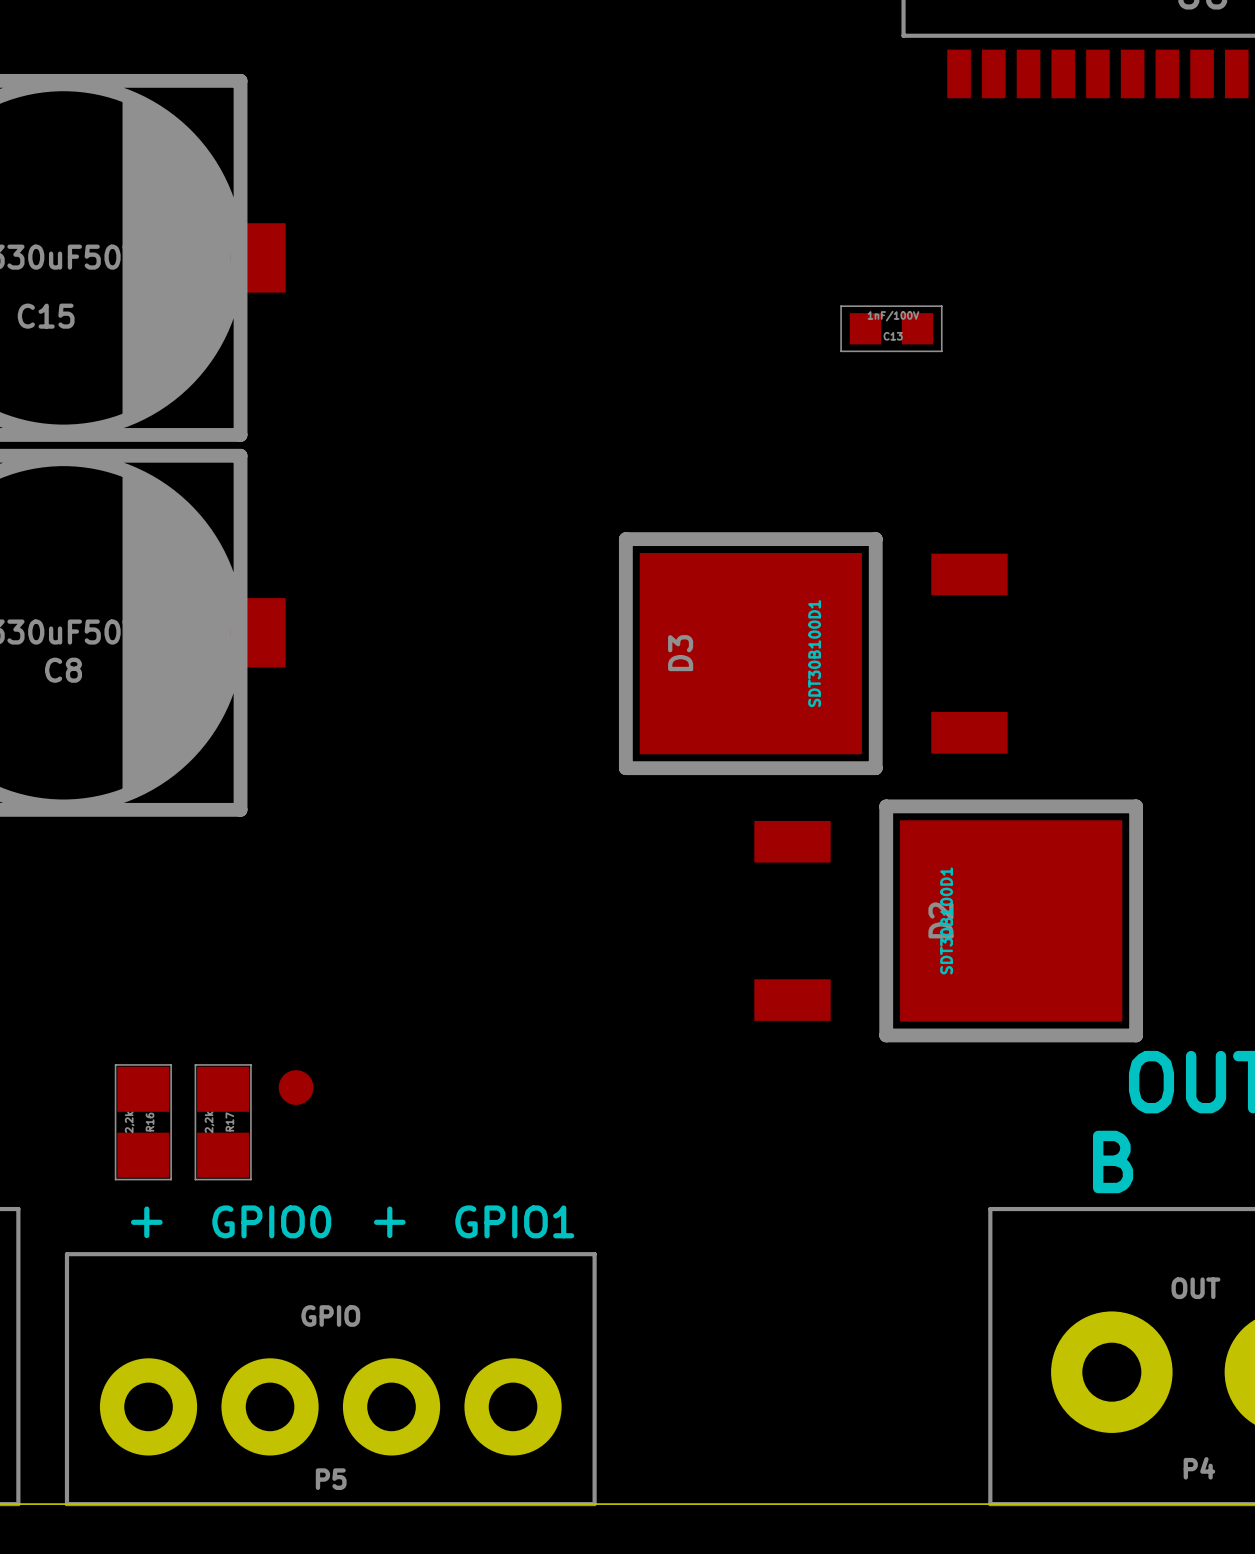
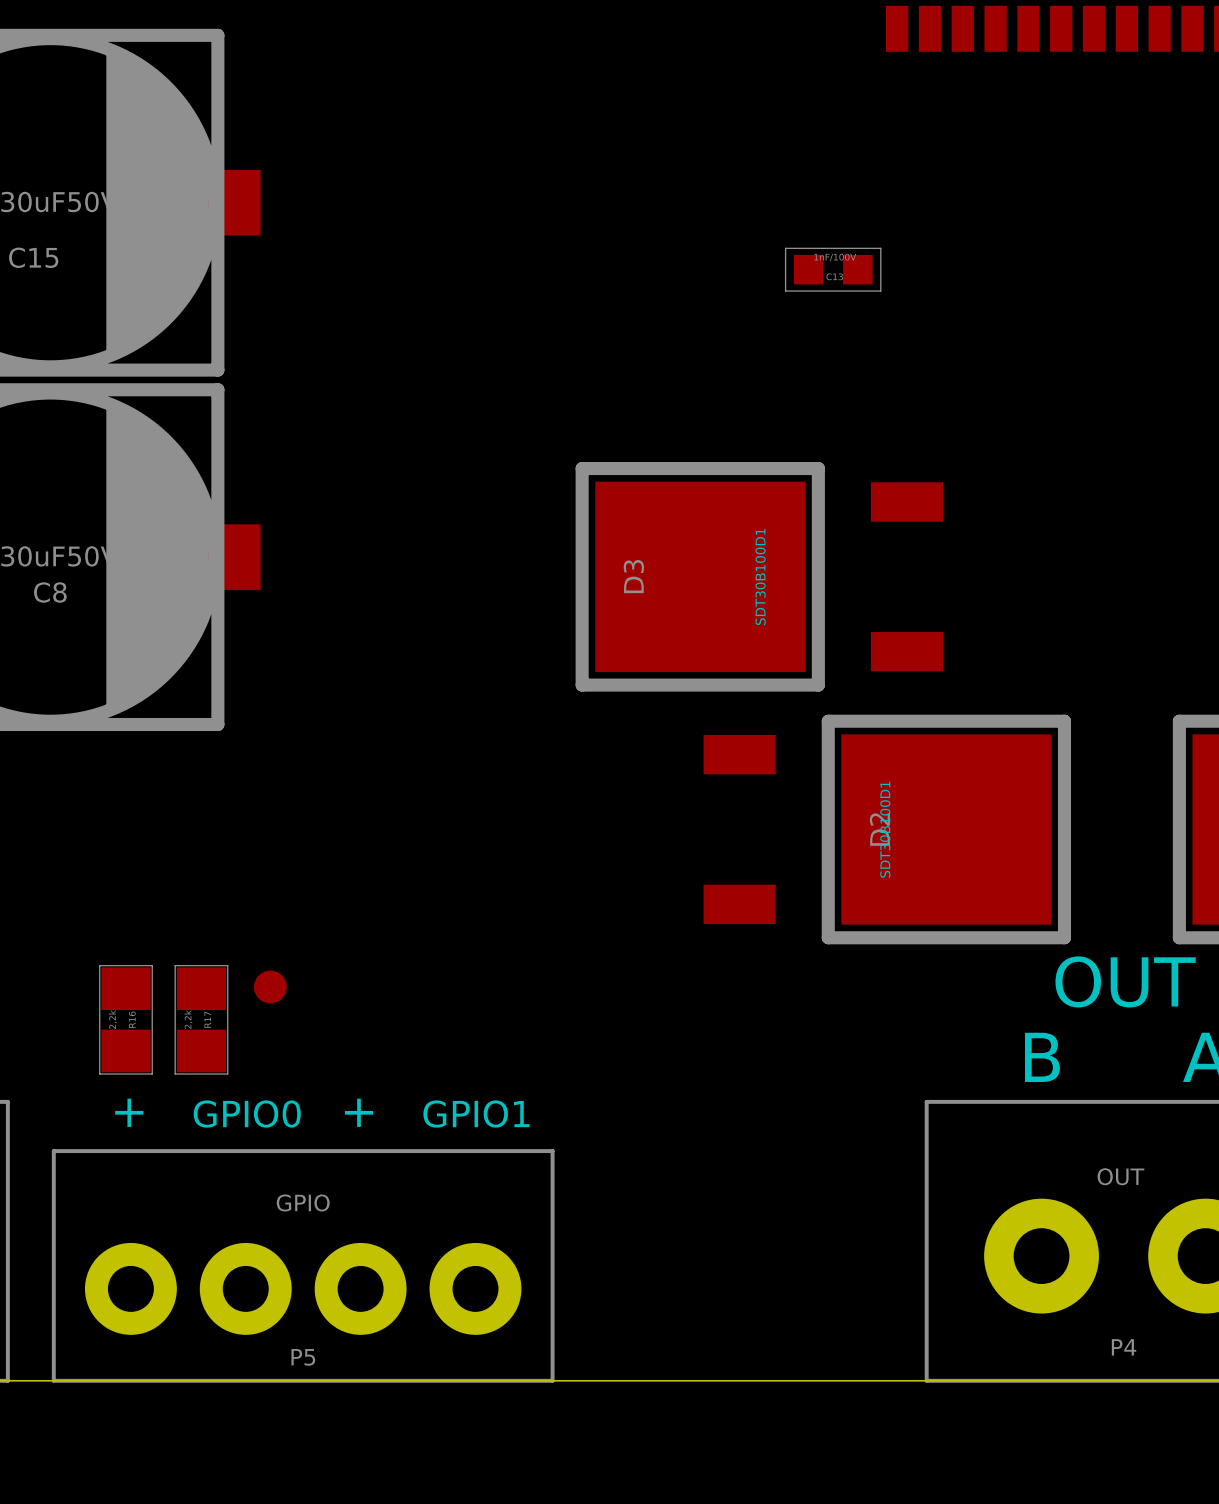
P5 footprint: [64, 1252, 597, 1507] -> [51, 1149, 555, 1383]

